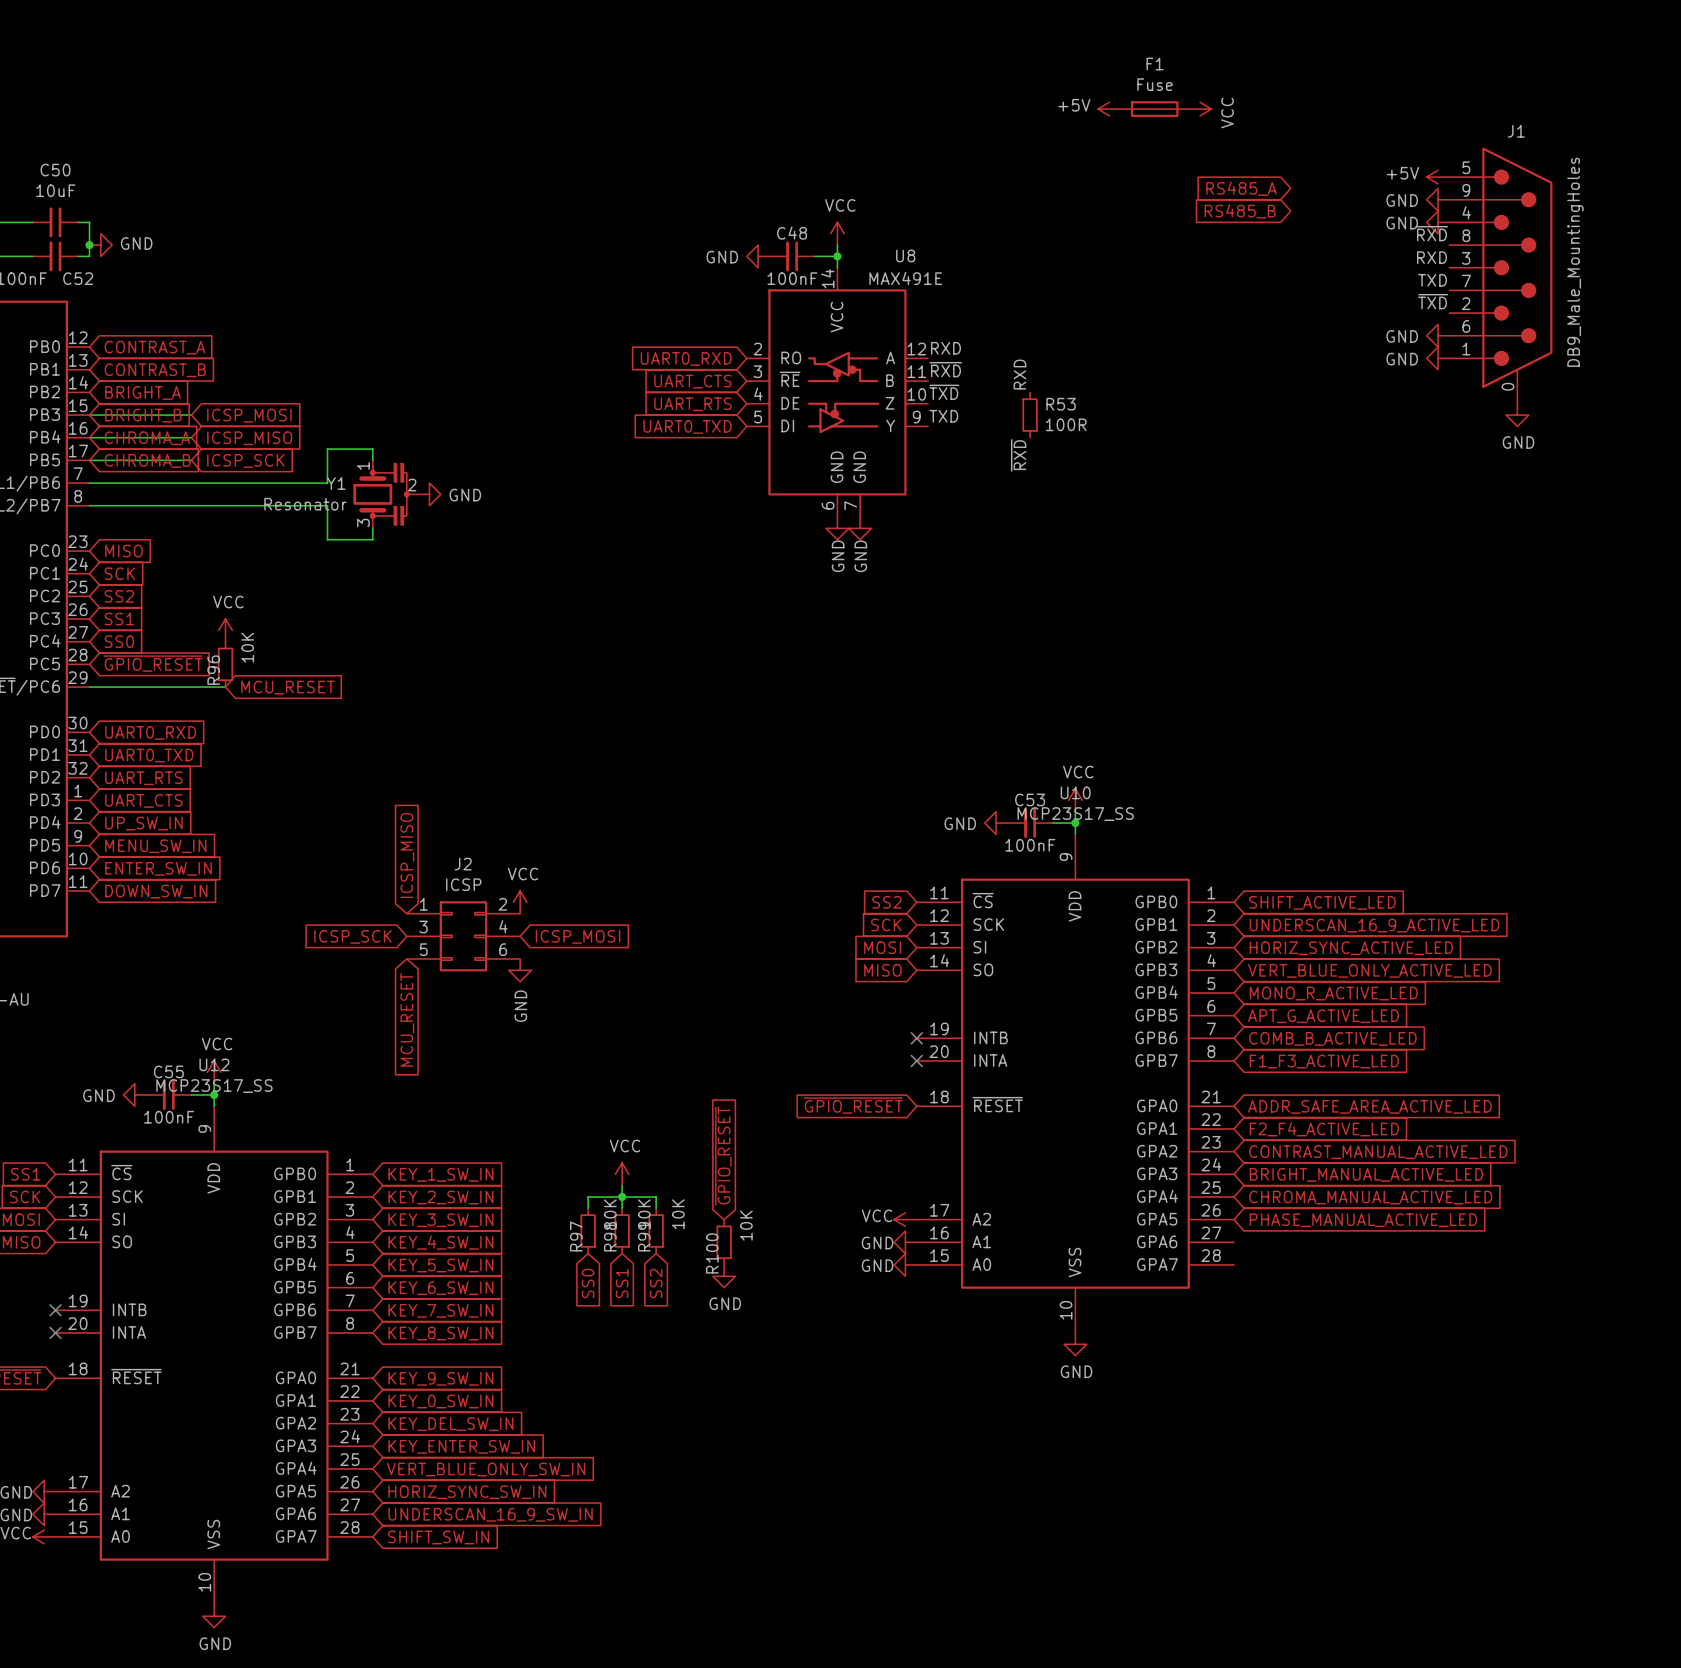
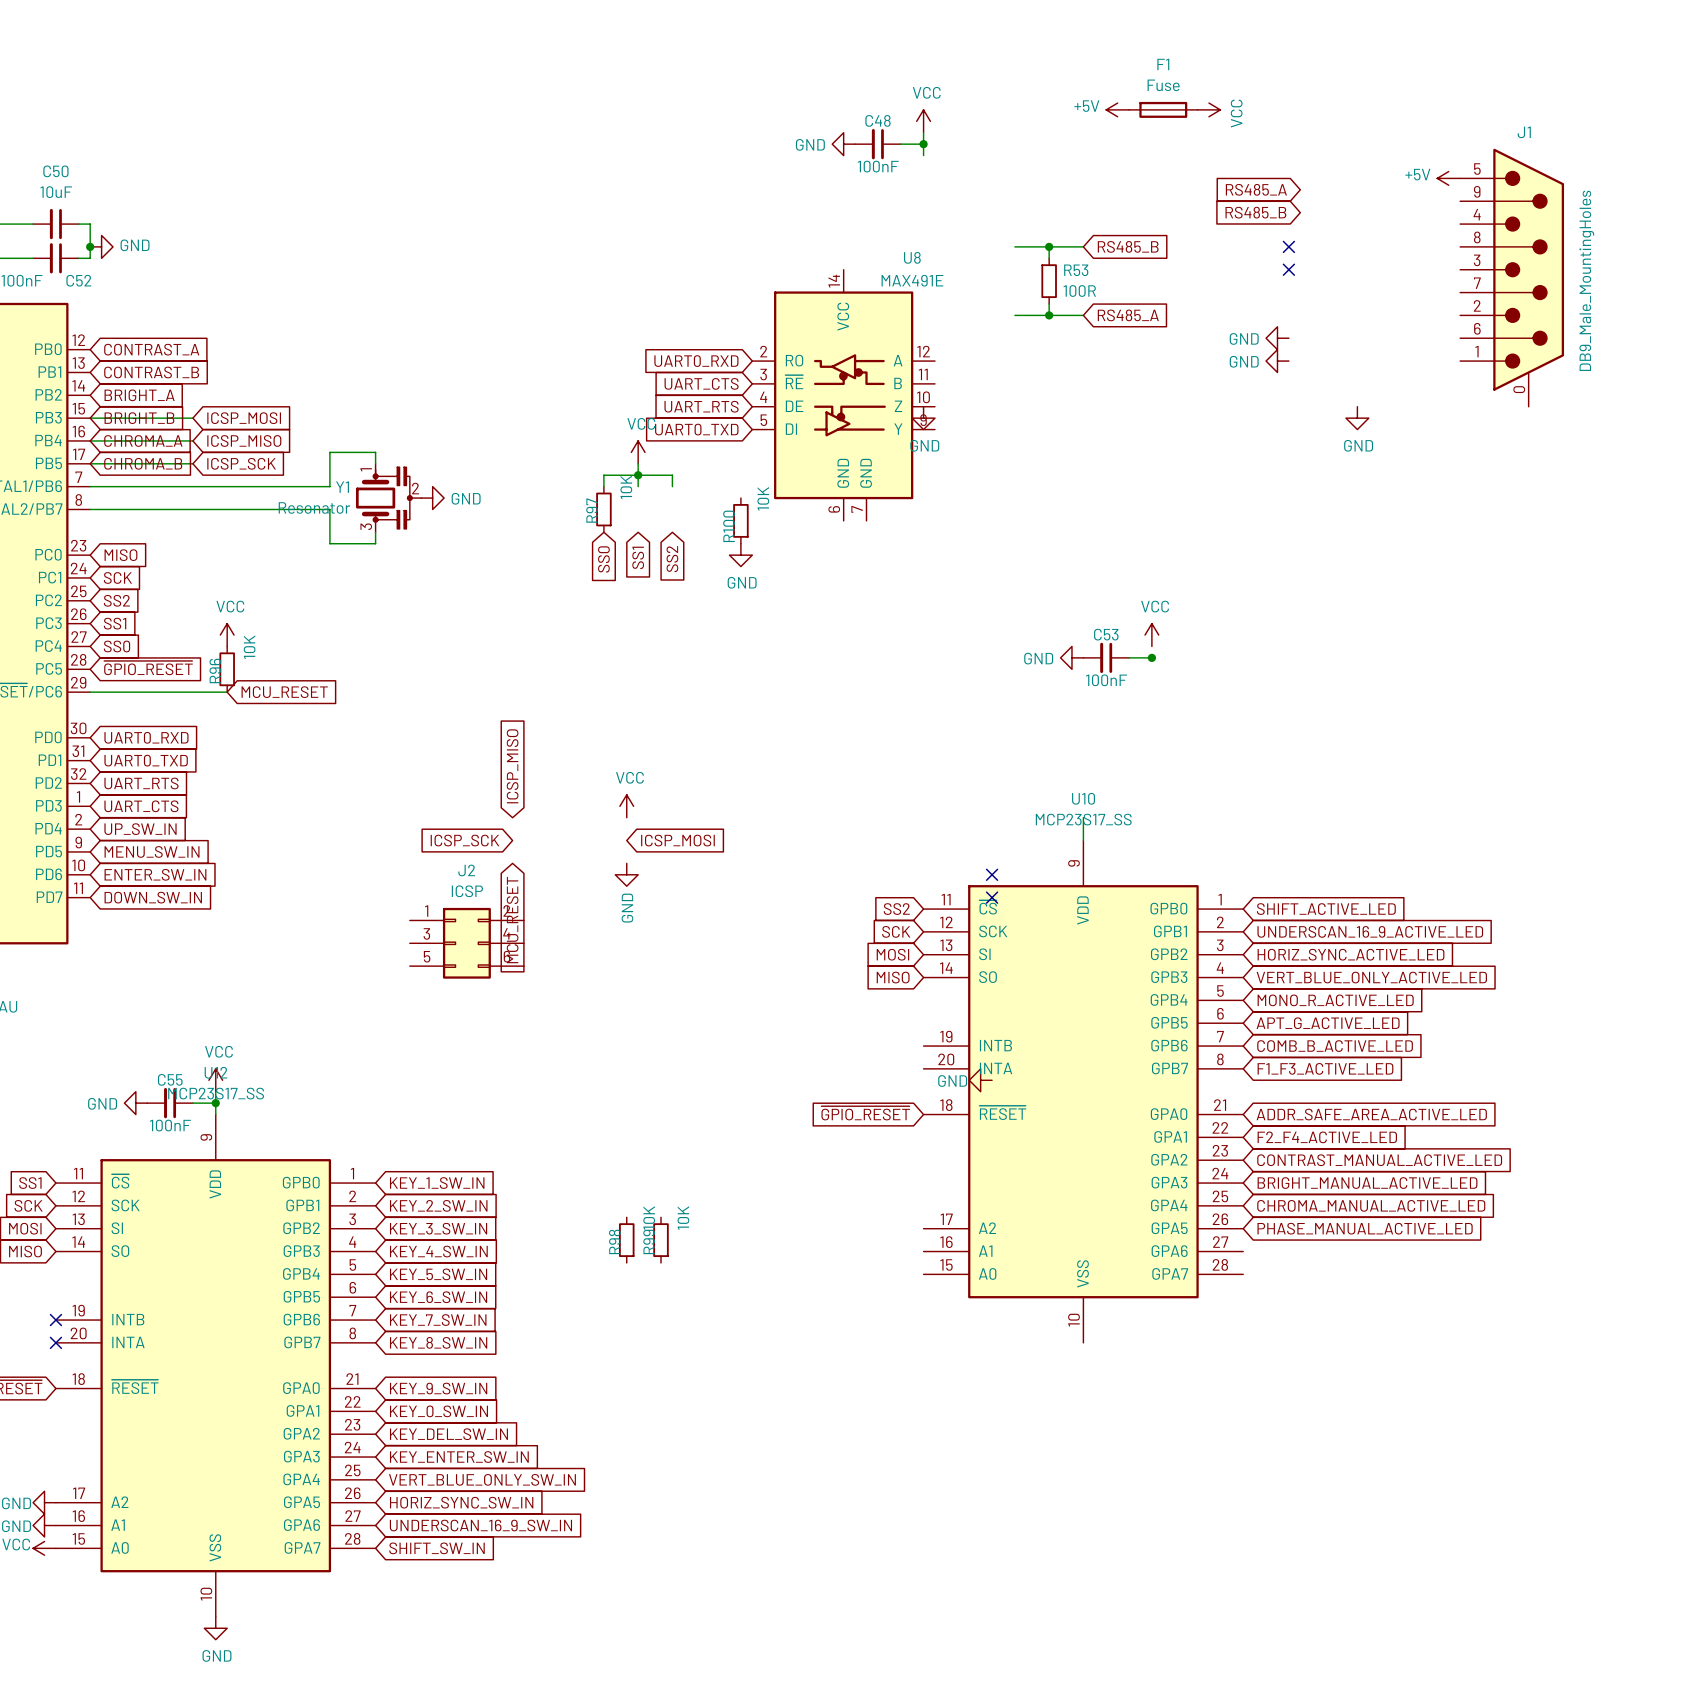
power symbol: none -> GND (843, 144)
junction: none -> (923, 144)
power symbol: GND (1438, 199) -> none
power symbol: GND (1438, 222) -> none
power symbol position: VCC (837, 233) -> VCC (923, 121)
label: ~{RXD} (1431, 233) -> none
wire: (837, 245) (837, 267) -> (923, 132) (923, 155)
wire: none -> (1014, 246) (1083, 246)
wire: none -> (1049, 246) (1049, 258)
junction: none -> (1049, 246)
global label: none -> RS485_B (1128, 246)
no-connect mark: none -> (1288, 246)
power symbol: GND (758, 256) -> none
C48 position: (792, 256) -> (877, 144)
wire: (814, 256) (837, 256) -> (900, 144) (923, 144)
junction: (837, 256) -> none
label: RXD (1432, 257) -> none
no-connect mark: none -> (1288, 269)
label: TXD (1432, 280) -> none
wire: none -> (1049, 303) (1049, 315)
label: ~{TXD} (1433, 301) -> none
wire: none -> (1014, 315) (1083, 315)
junction: none -> (1049, 315)
global label: none -> RS485_A (1128, 315)
power symbol: none -> GND (1277, 338)
power symbol: GND (1438, 335) -> none
label: RXD (945, 348) -> none
power symbol: none -> GND (1277, 361)
power symbol: GND (1438, 358) -> none
label: ~{RXD} (945, 369) -> none
label: RXD (1019, 374) -> none
label: ~{TXD} (944, 392) -> none
power symbol: none -> GND (923, 418)
R53 position: (1030, 415) -> (1049, 281)
power symbol: none -> GND (1357, 418)
power symbol: GND (1517, 415) -> none
label: TXD (943, 416) -> none
power symbol: none -> VCC (638, 452)
label: ~{RXD} (1018, 455) -> none
wire: none -> (638, 463) (638, 486)
junction: none -> (638, 475)
wire: none -> (603, 486) (603, 475) (672, 475) (672, 486)
power symbol: GND (837, 528) -> none
power symbol: GND (860, 528) -> none
power symbol: none -> GND (740, 555)
global label: none -> SS0 (603, 559)
global label: none -> SS1 (638, 557)
global label: none -> SS2 (672, 559)
power symbol: none -> GND (1071, 657)
junction: none -> (1151, 657)
power symbol position: VCC (1075, 800) -> VCC (1151, 635)
power symbol: GND (996, 823) -> none
C53 position: (1030, 823) -> (1106, 657)
wire: (1052, 823) (1075, 823) -> (1129, 657) (1151, 657)
junction: (1075, 823) -> none
global label position: ICSP_MISO (407, 855) -> ICSP_MISO (512, 766)
no-connect mark: none -> (992, 874)
no-connect mark: none -> (992, 897)
power symbol position: VCC (520, 902) -> VCC (626, 806)
global label position: ICSP_SCK (352, 936) -> ICSP_SCK (465, 840)
global label position: ICSP_MOSI (578, 936) -> ICSP_MOSI (677, 840)
power symbol position: GND (520, 970) -> GND (626, 874)
global label position: MCU_RESET (407, 1019) -> MCU_RESET (512, 920)
no-connect mark: (916, 1038) -> none
no-connect mark: (916, 1060) -> none
power symbol: none -> GND (980, 1080)
global label: ~{GPIO_RESET} (723, 1156) -> none
power symbol: VCC (622, 1174) -> none
wire: (622, 1185) (622, 1208) -> none
junction: (622, 1196) -> none
wire: (588, 1208) (588, 1196) (656, 1196) (656, 1208) -> none
power symbol: VCC (905, 1219) -> none
R97 position: (588, 1230) -> (603, 509)
R100 position: (724, 1242) -> (740, 520)
power symbol: GND (905, 1242) -> none
power symbol: GND (905, 1264) -> none
power symbol: GND (724, 1276) -> none
global label: SS0 (588, 1283) -> none
global label: SS1 (622, 1283) -> none
global label: SS2 (656, 1283) -> none
power symbol: GND (1075, 1344) -> none

